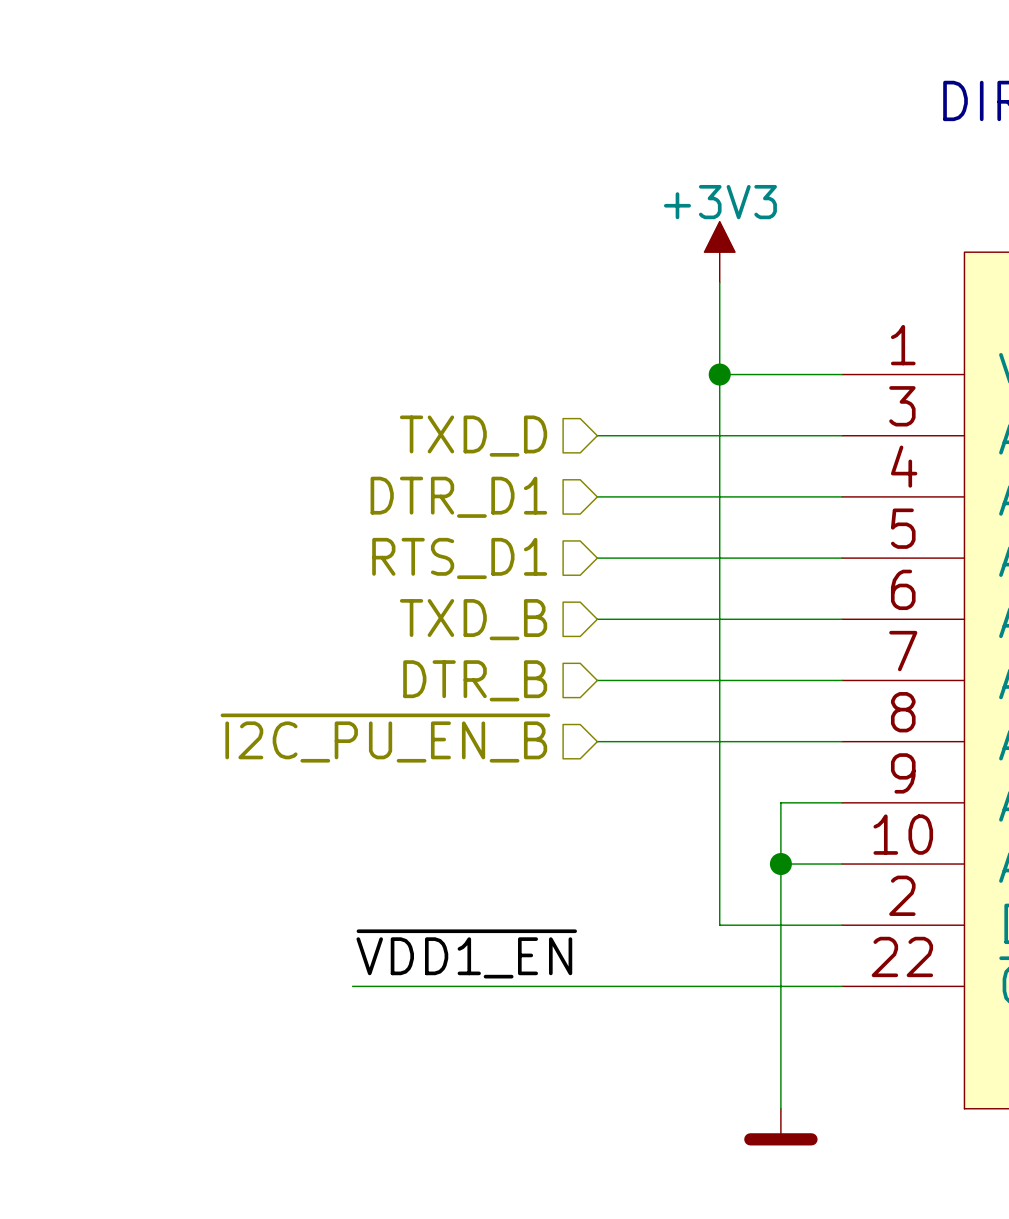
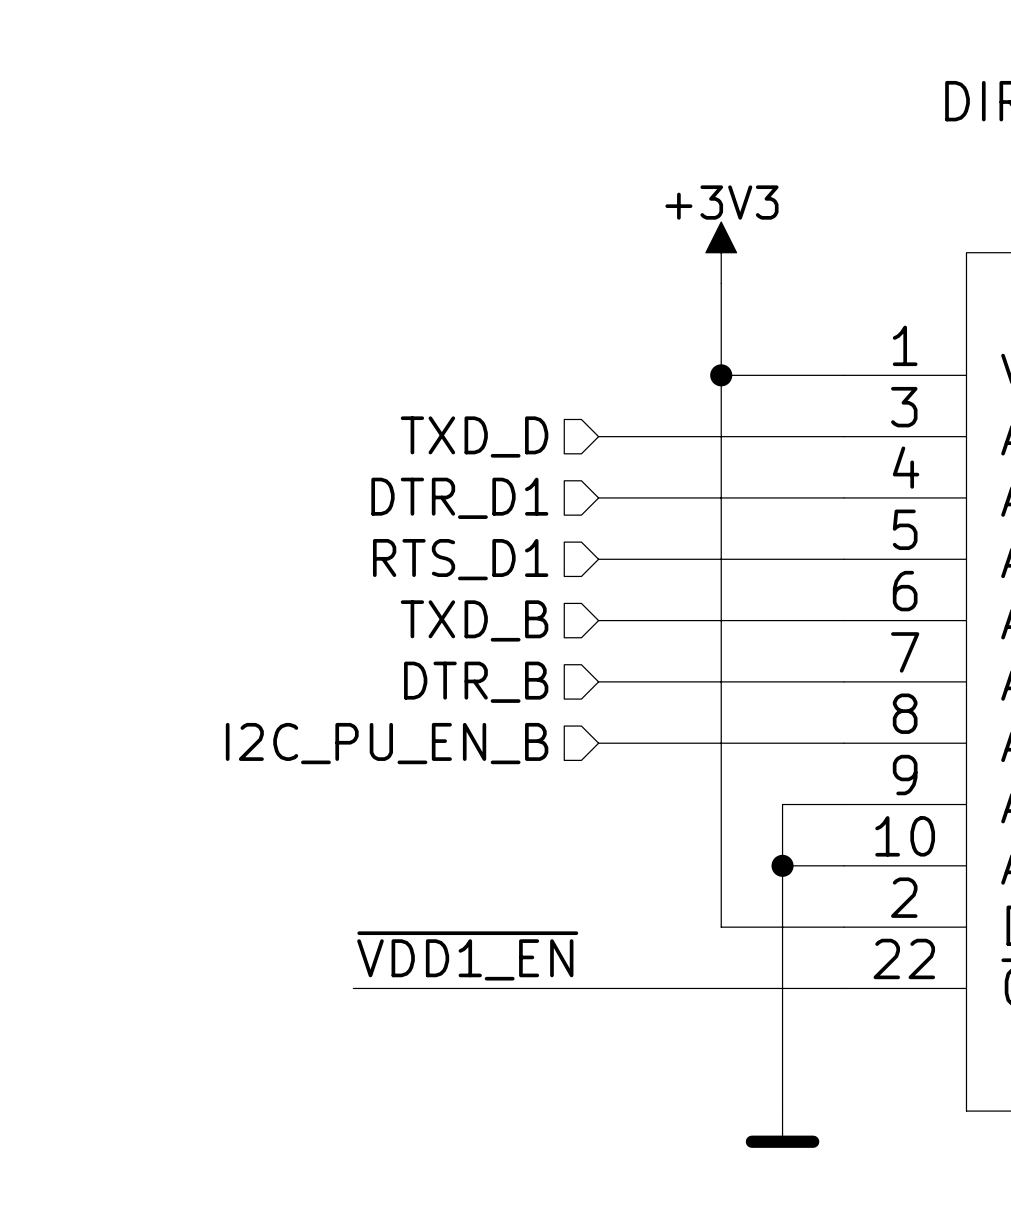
hierarchical label: ~{I2C_PU_EN_B} (385, 738) -> I2C_PU_EN_B (387, 743)

